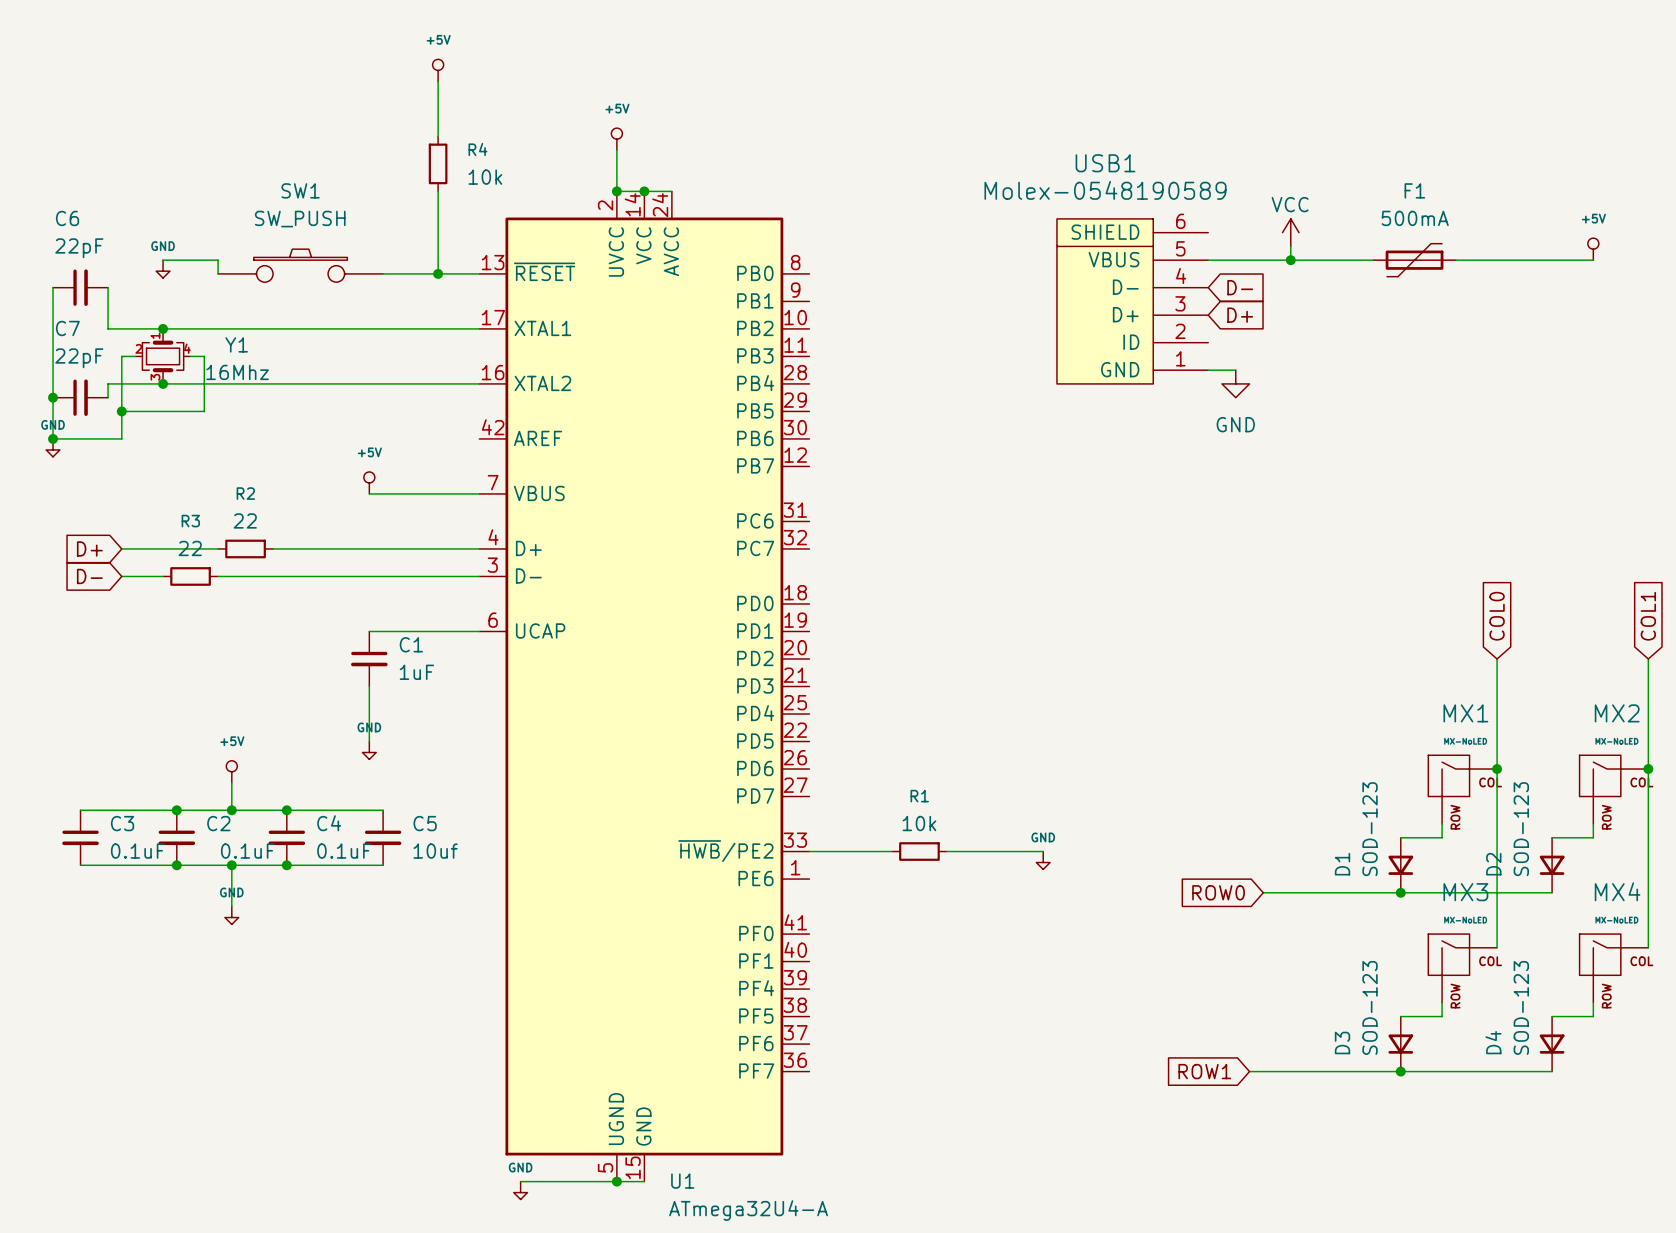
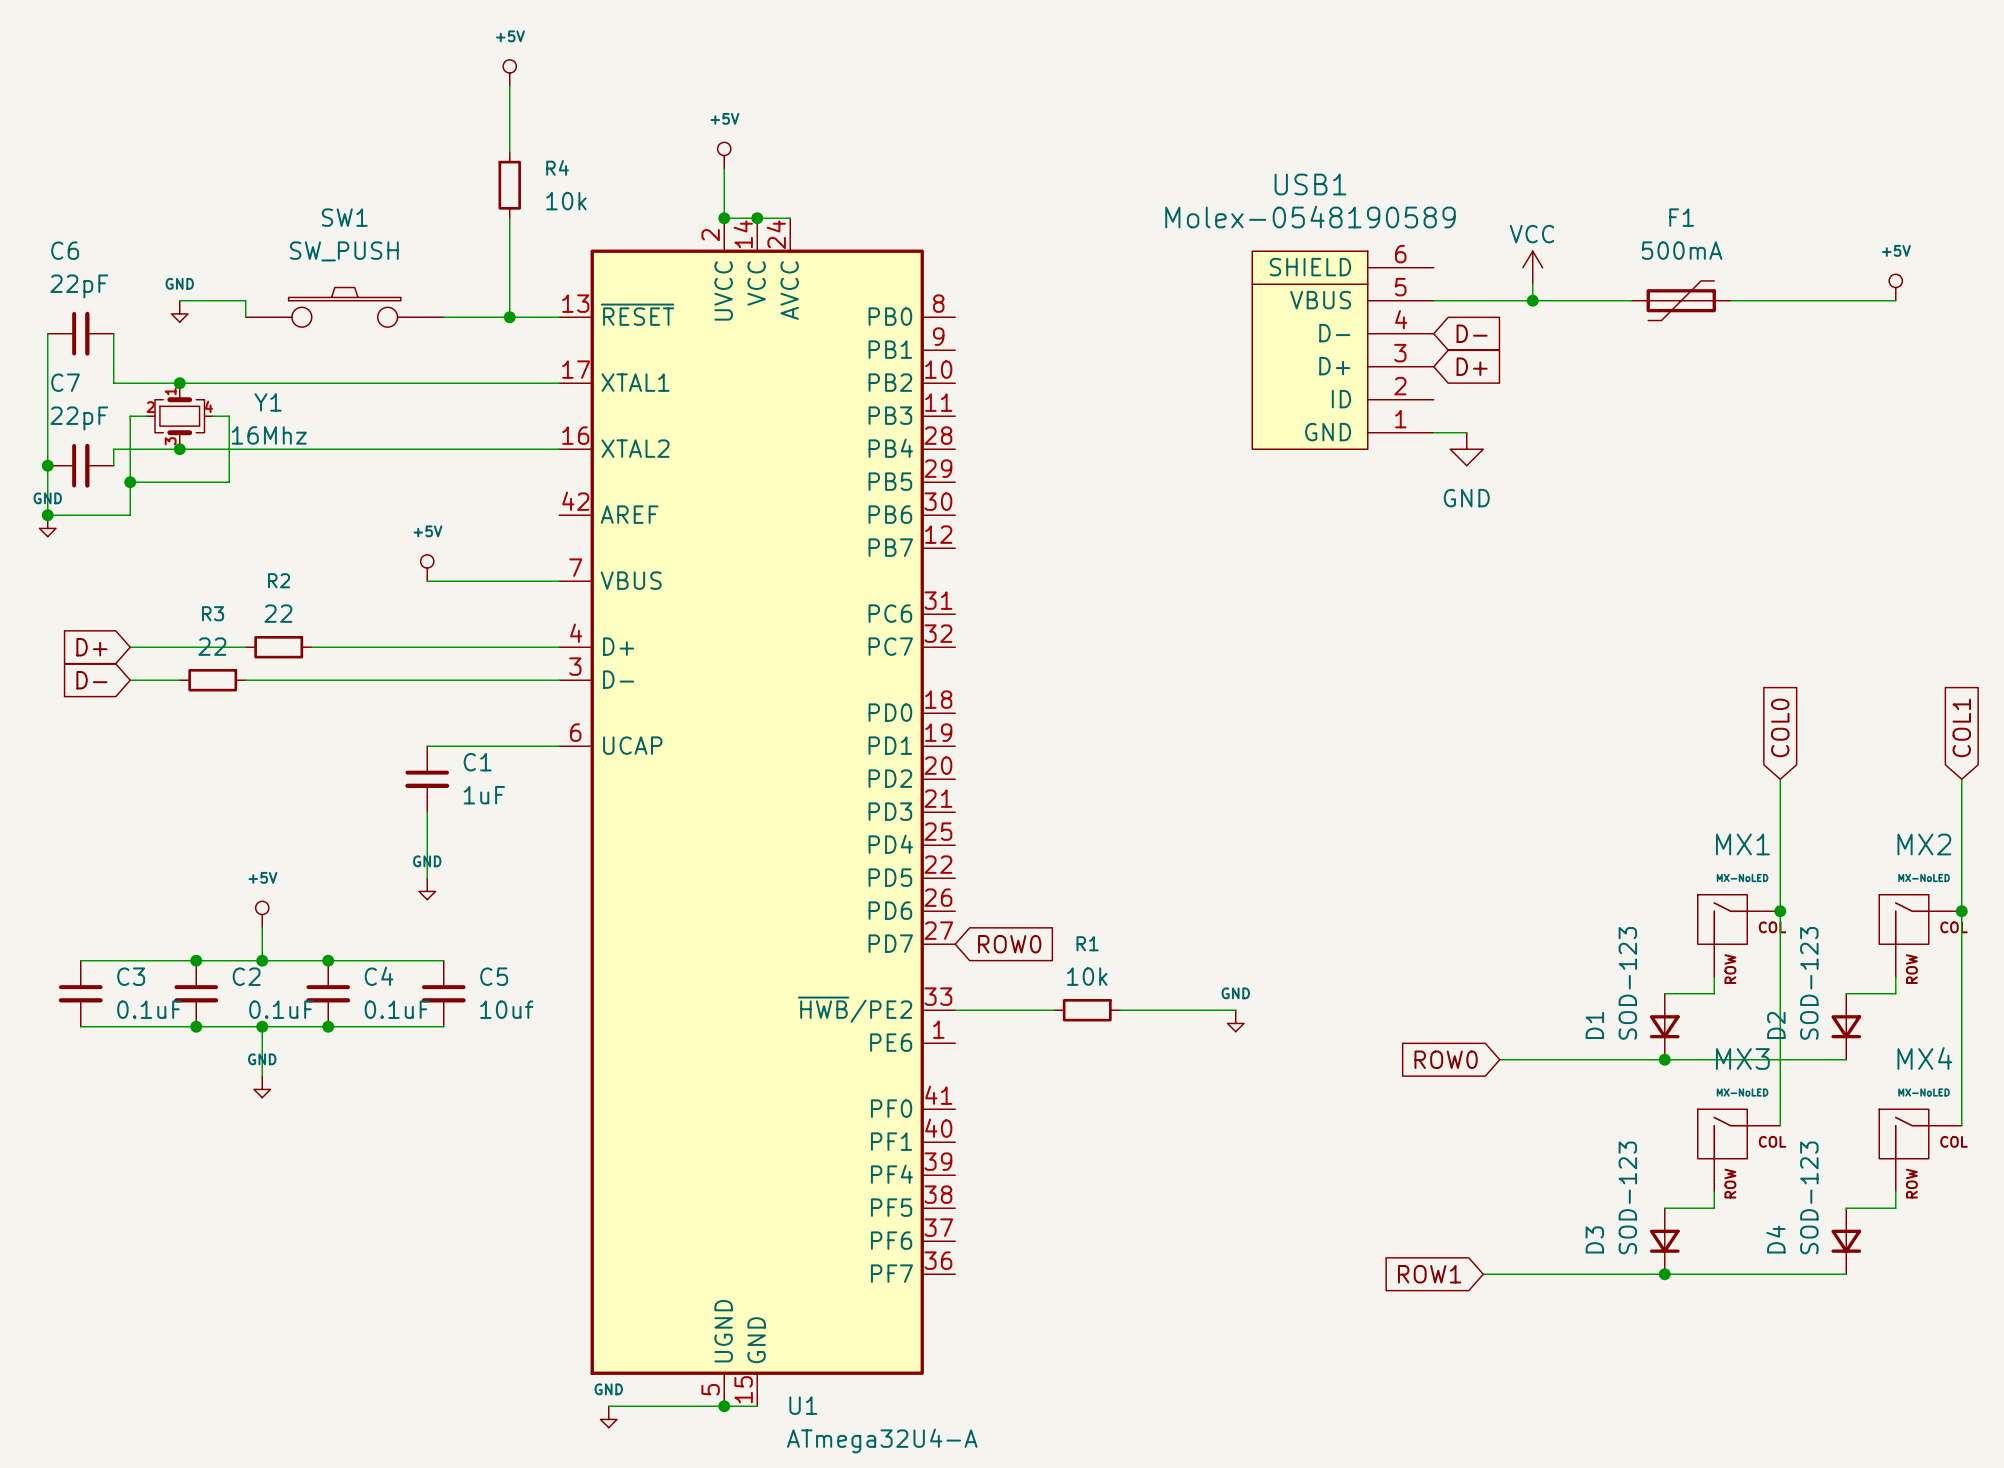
global label: none -> ROW0 (1009, 944)

